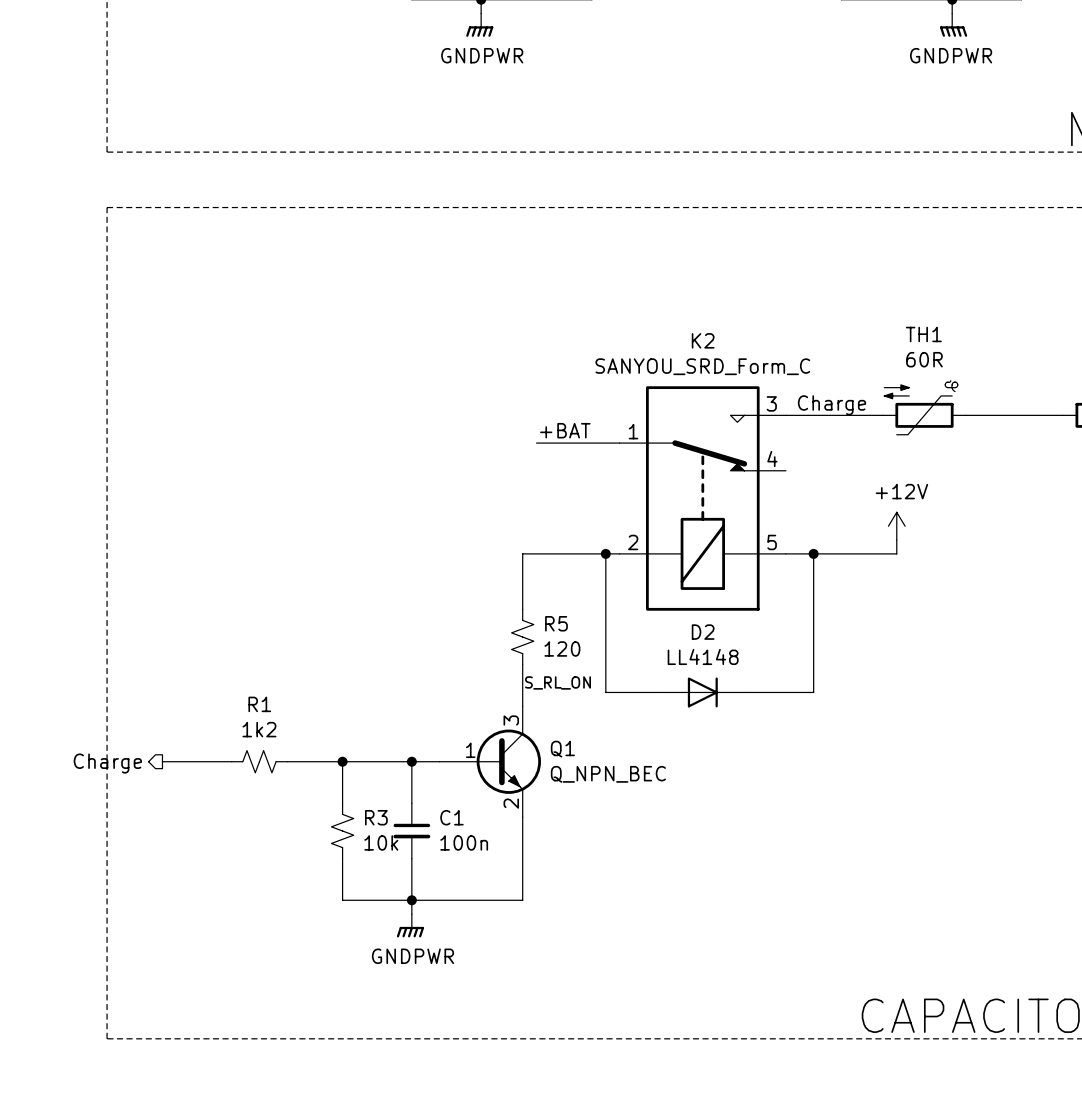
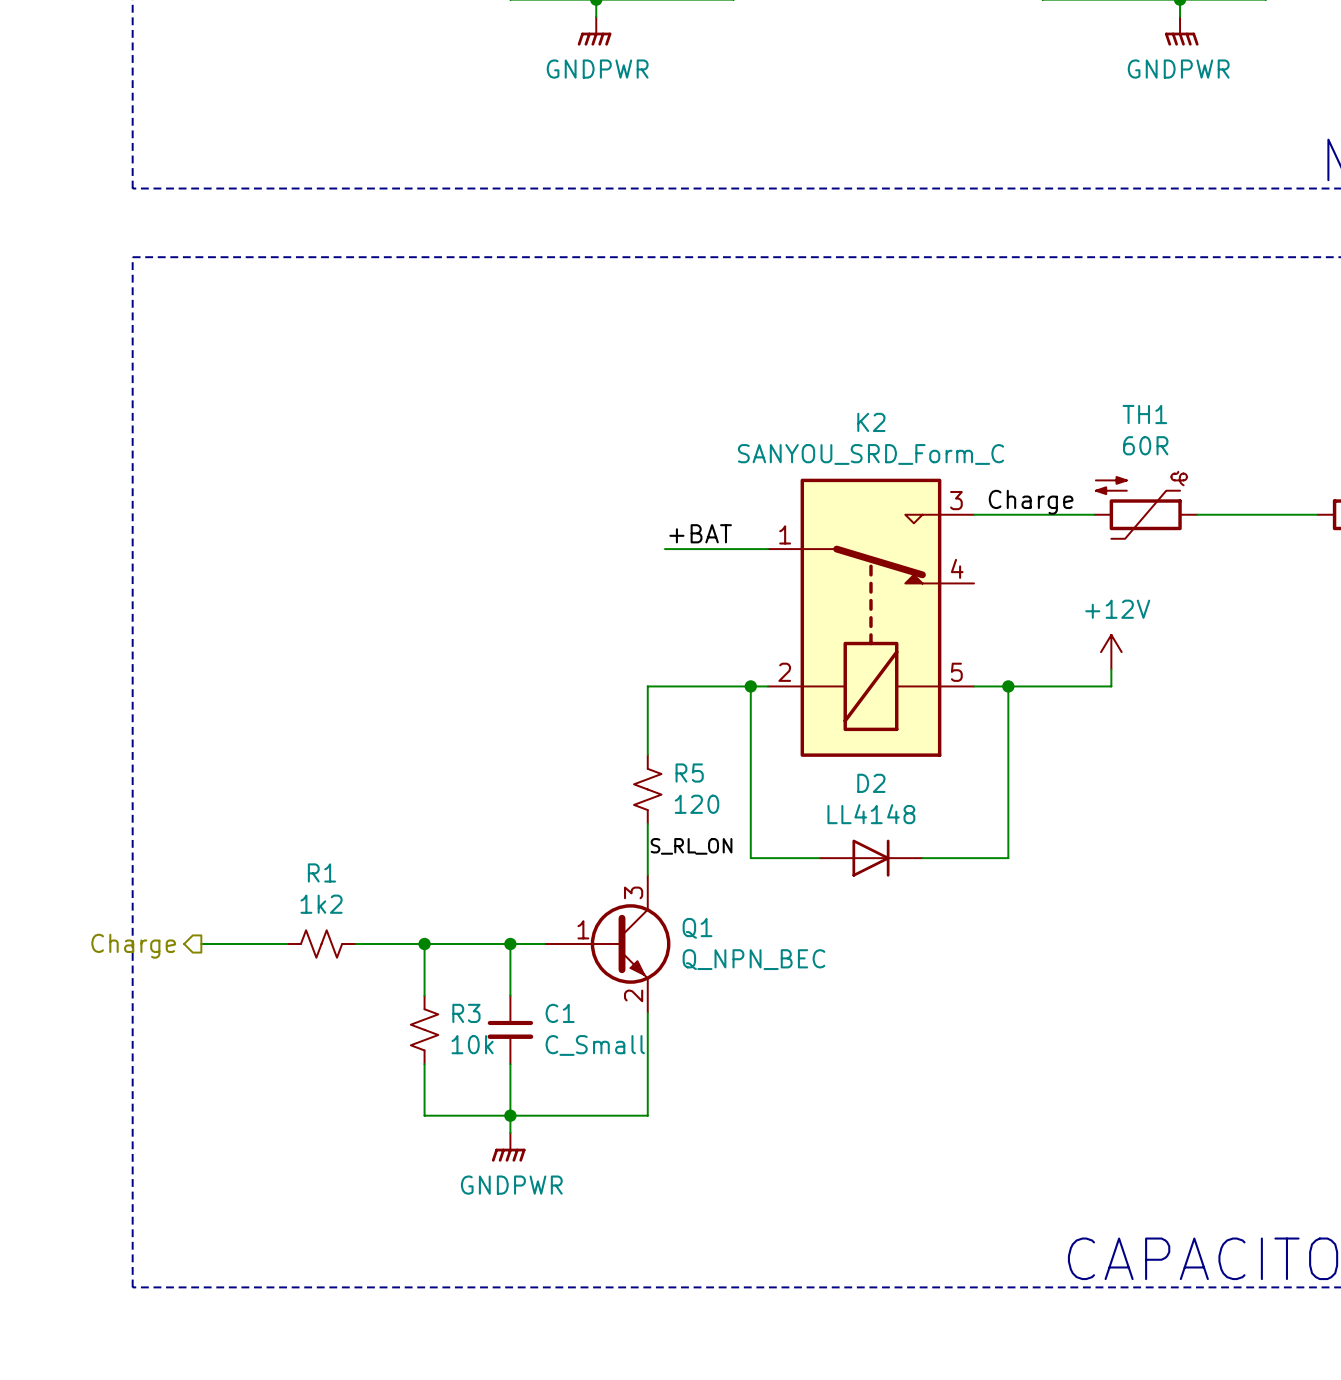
C1 value: 100n (464, 842) -> C_Small (595, 1045)

